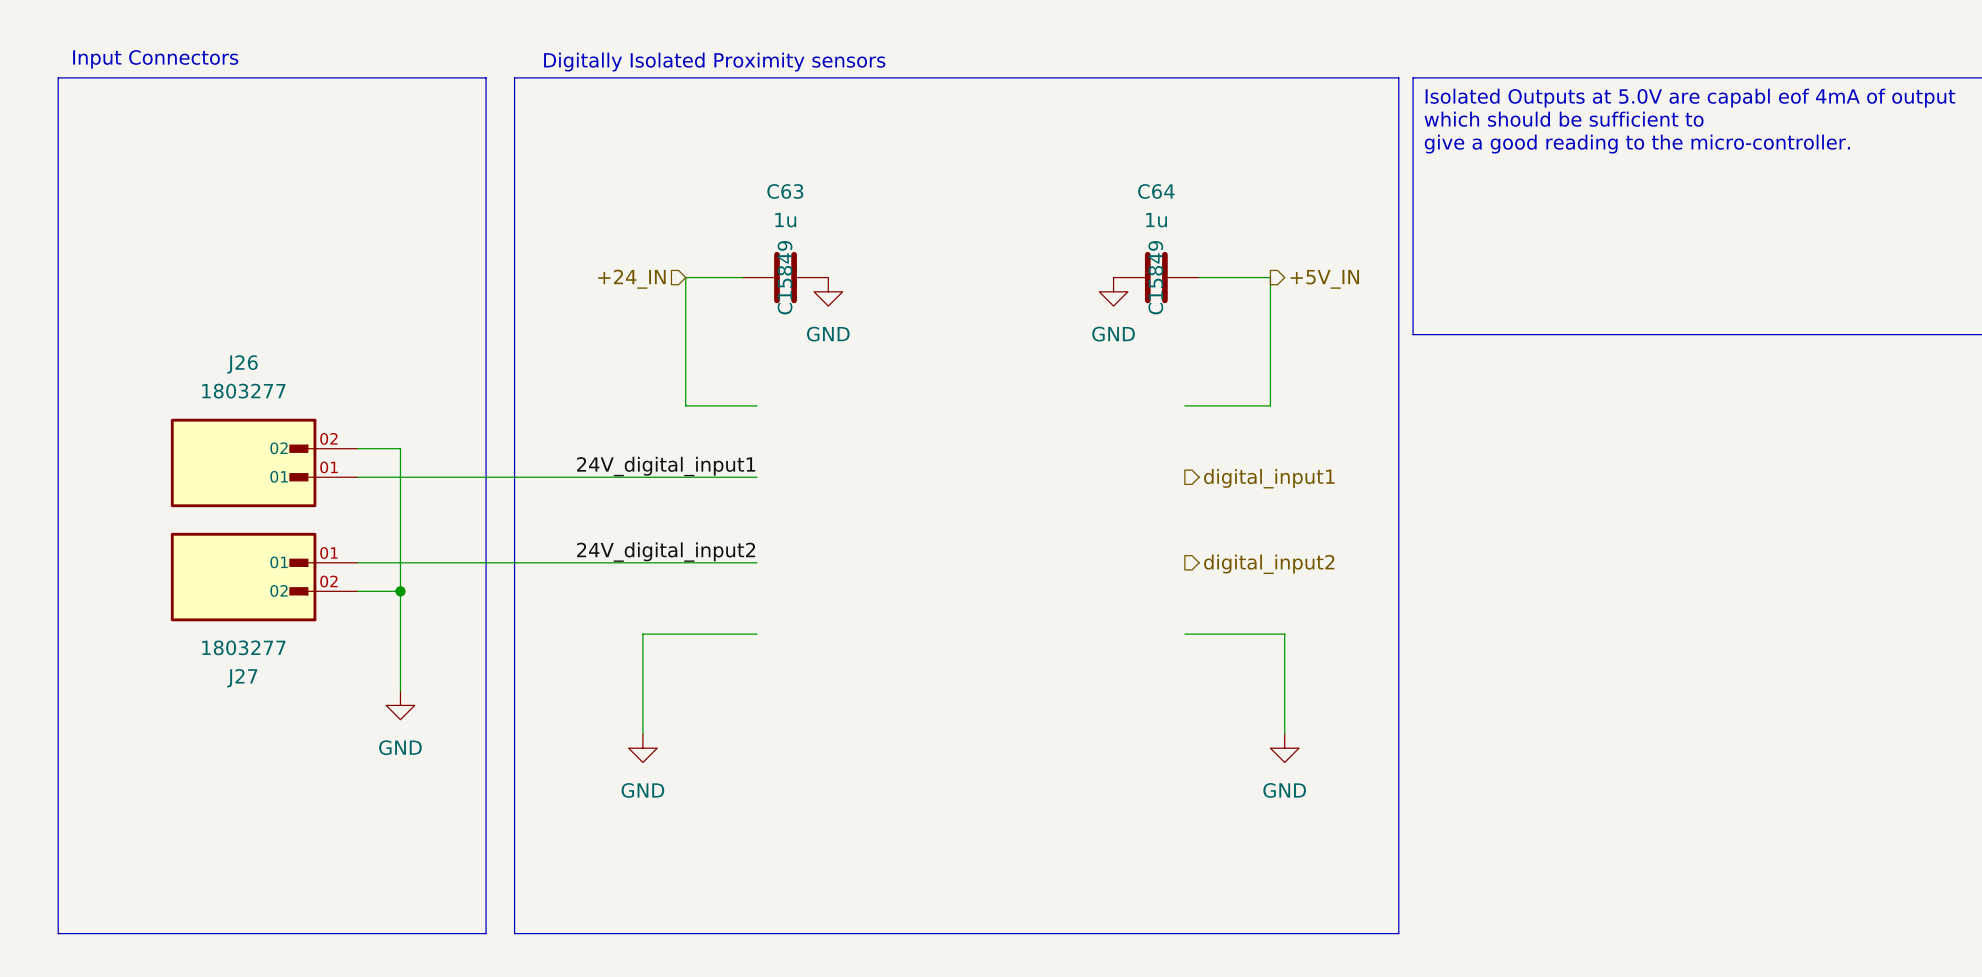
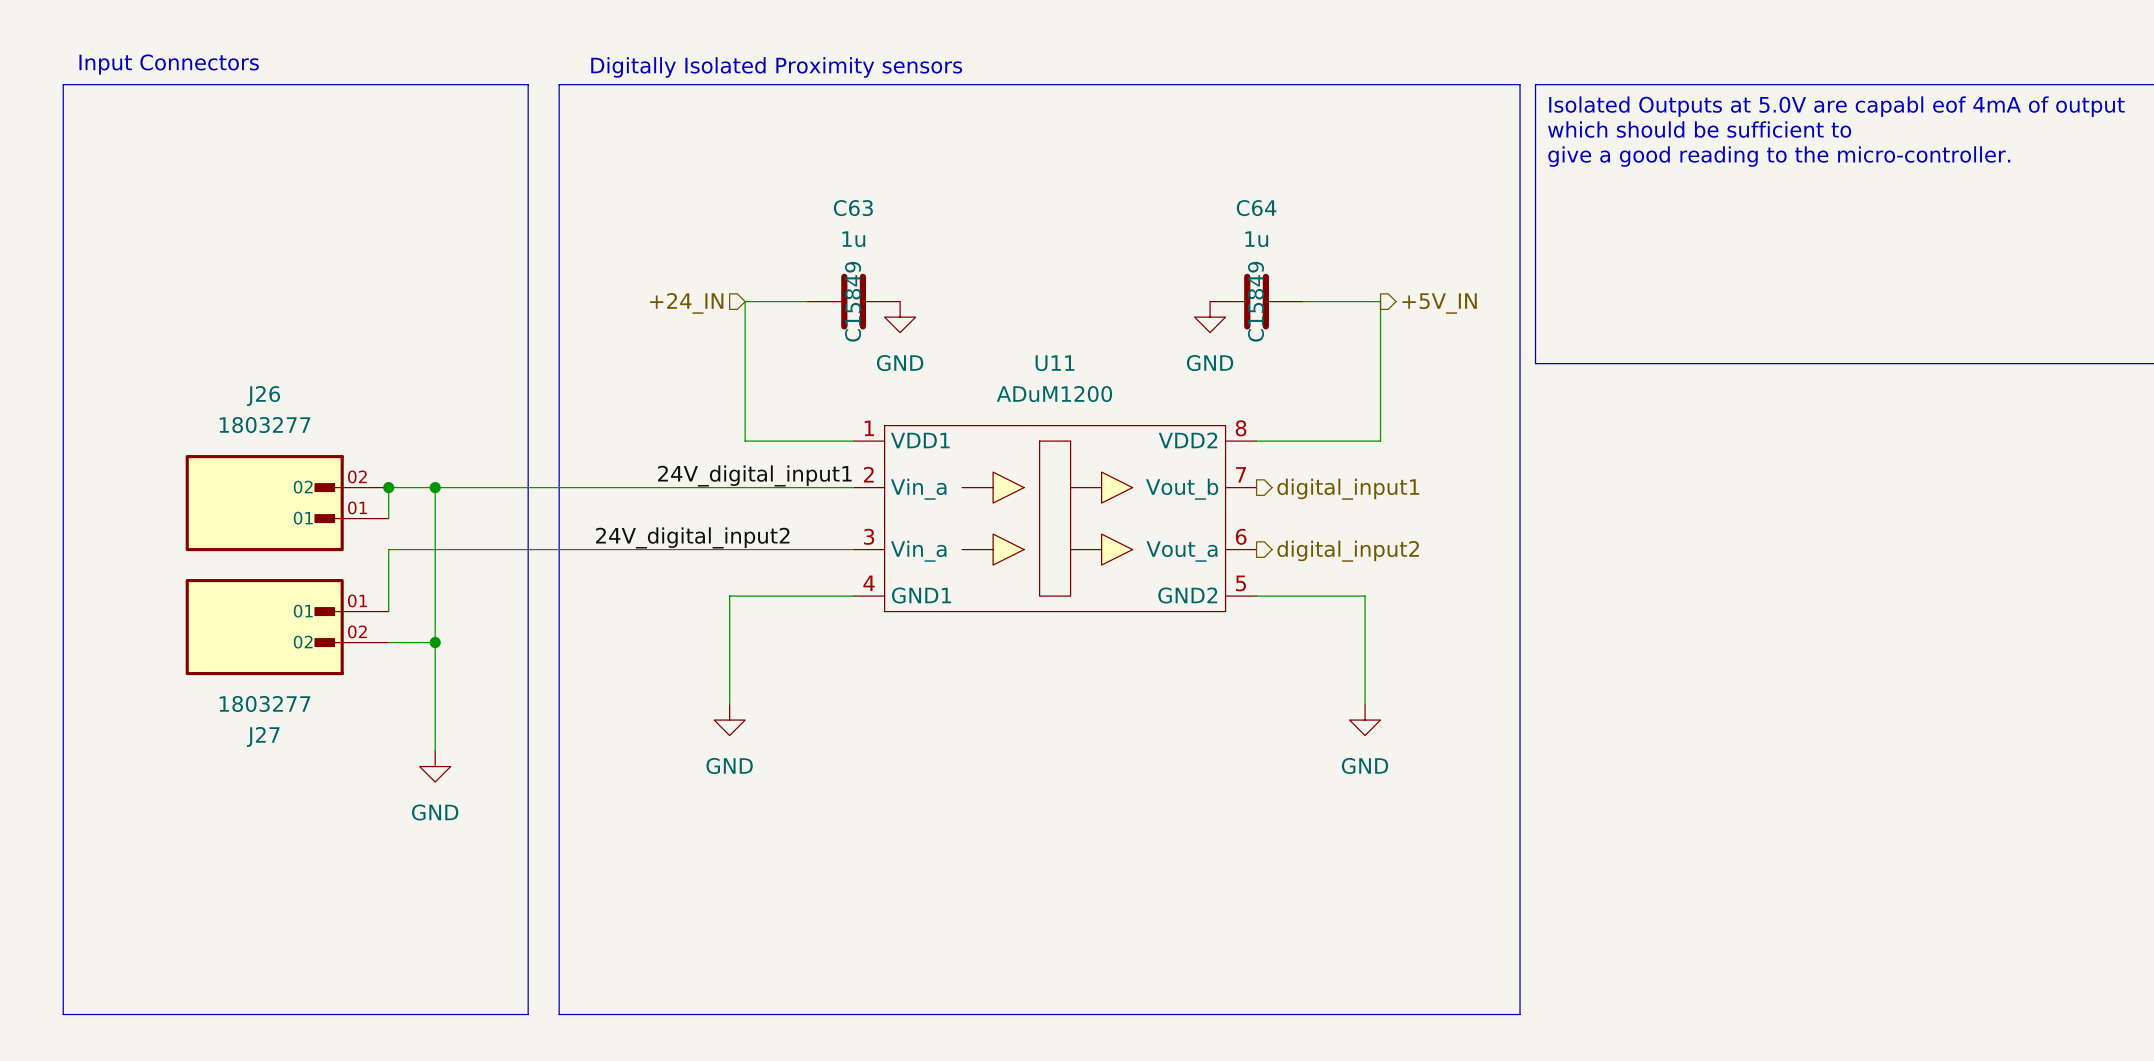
wire: none -> (822, 441) (853, 441)
wire: none -> (1256, 441) (1287, 441)
junction: none -> (388, 487)
wire: none -> (435, 487) (853, 487)
junction: none -> (435, 487)
label position: 24V_digital_input1 (666, 466) -> 24V_digital_input1 (754, 475)
wire: (357, 477) (757, 477) -> (388, 518) (388, 487)
U11: none -> ADuM1200 (1055, 518)
hierarchical label position: digital_input1 (1269, 478) -> digital_input1 (1348, 489)
label position: 24V_digital_input2 (666, 552) -> 24V_digital_input2 (692, 537)
wire: (357, 562) (757, 562) -> (388, 611) (388, 549) (853, 549)
hierarchical label position: digital_input2 (1269, 564) -> digital_input2 (1348, 551)
wire: (757, 634) (642, 634) (642, 733) -> (853, 596) (729, 596) (729, 704)
wire: (1184, 634) (1284, 634) (1284, 733) -> (1256, 596) (1365, 596) (1365, 704)
power symbol position: GND (642, 748) -> GND (729, 720)
power symbol position: GND (1284, 748) -> GND (1365, 720)

